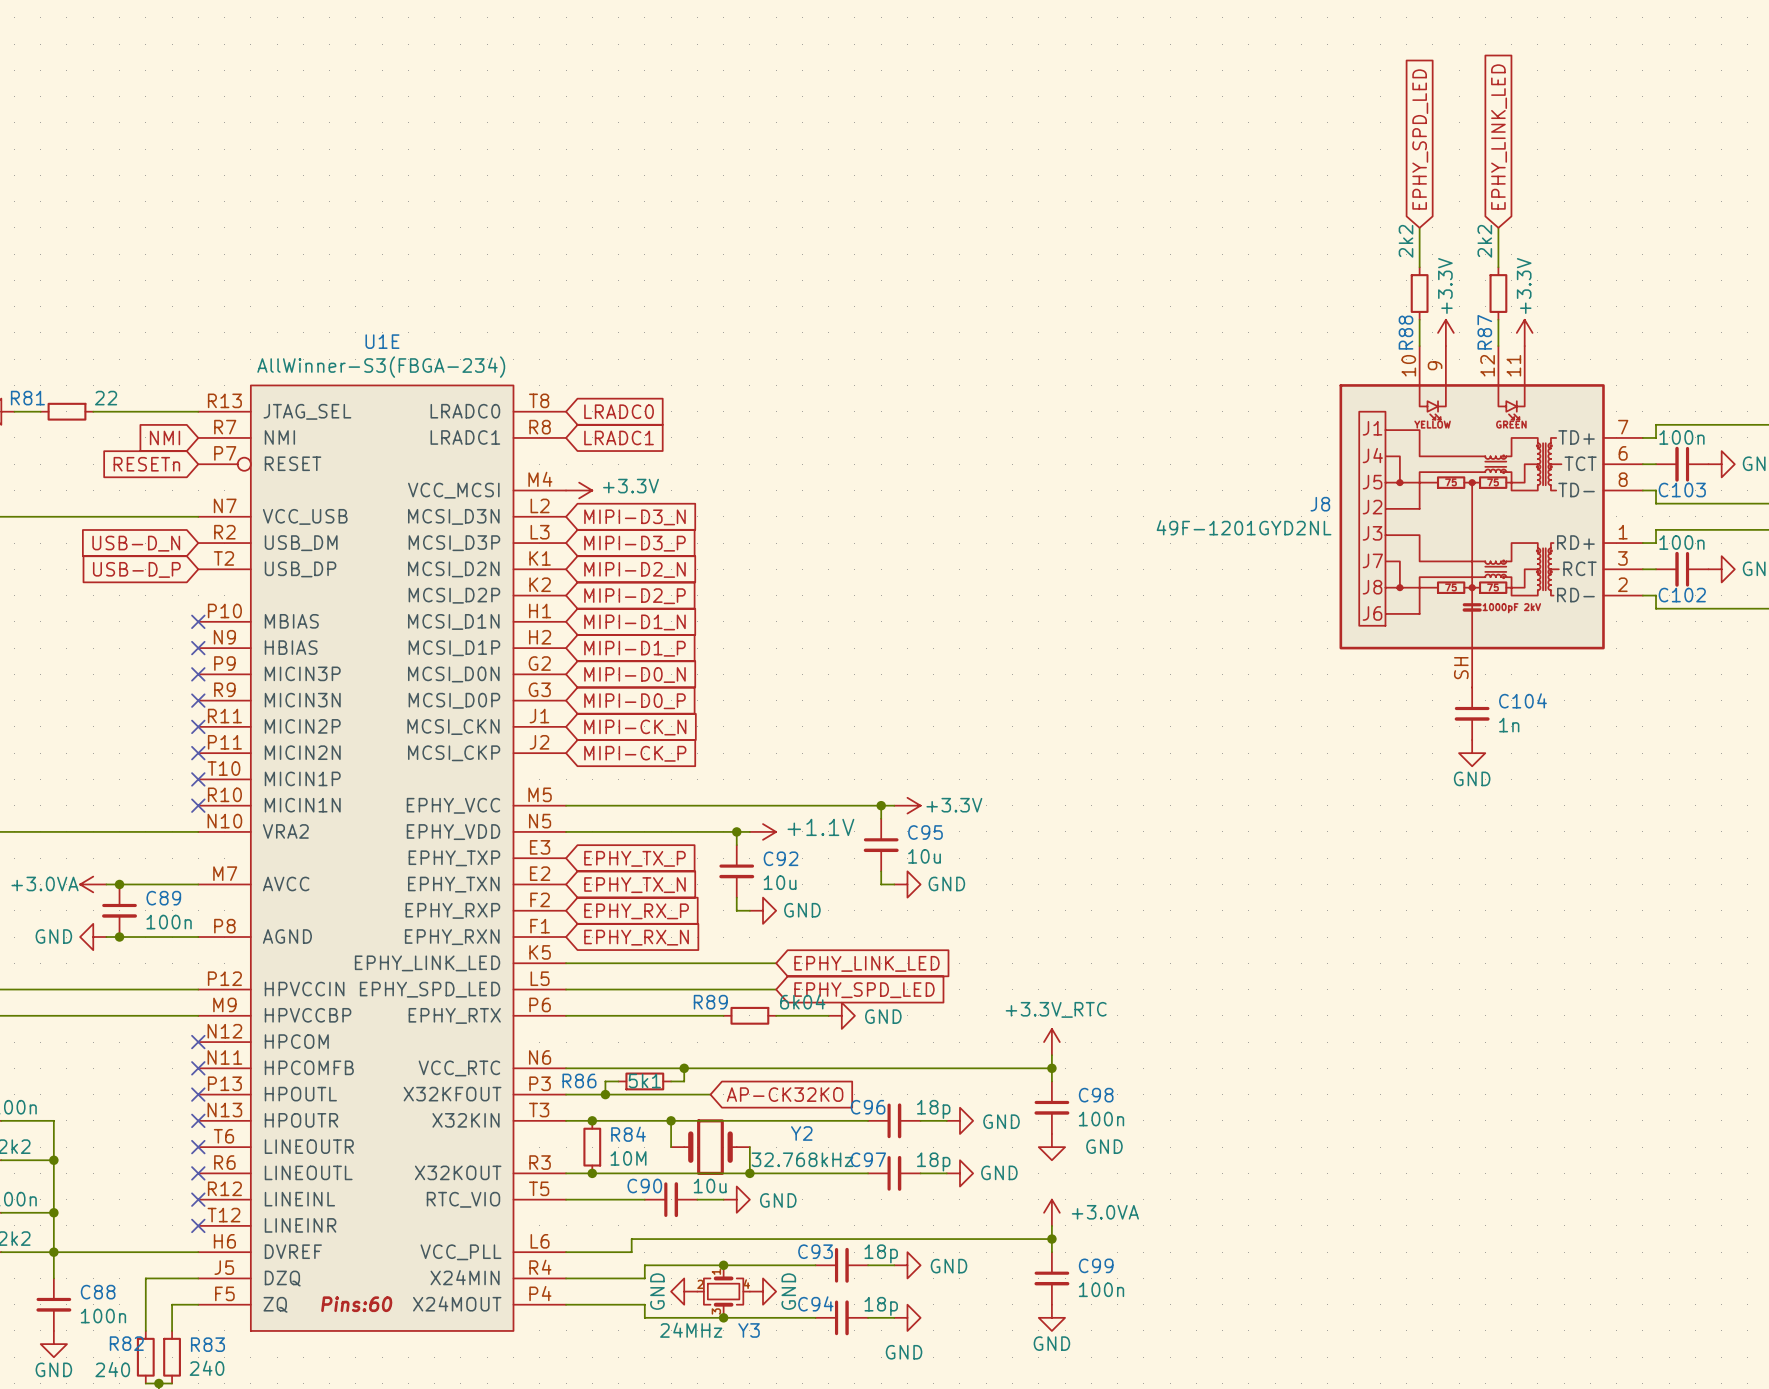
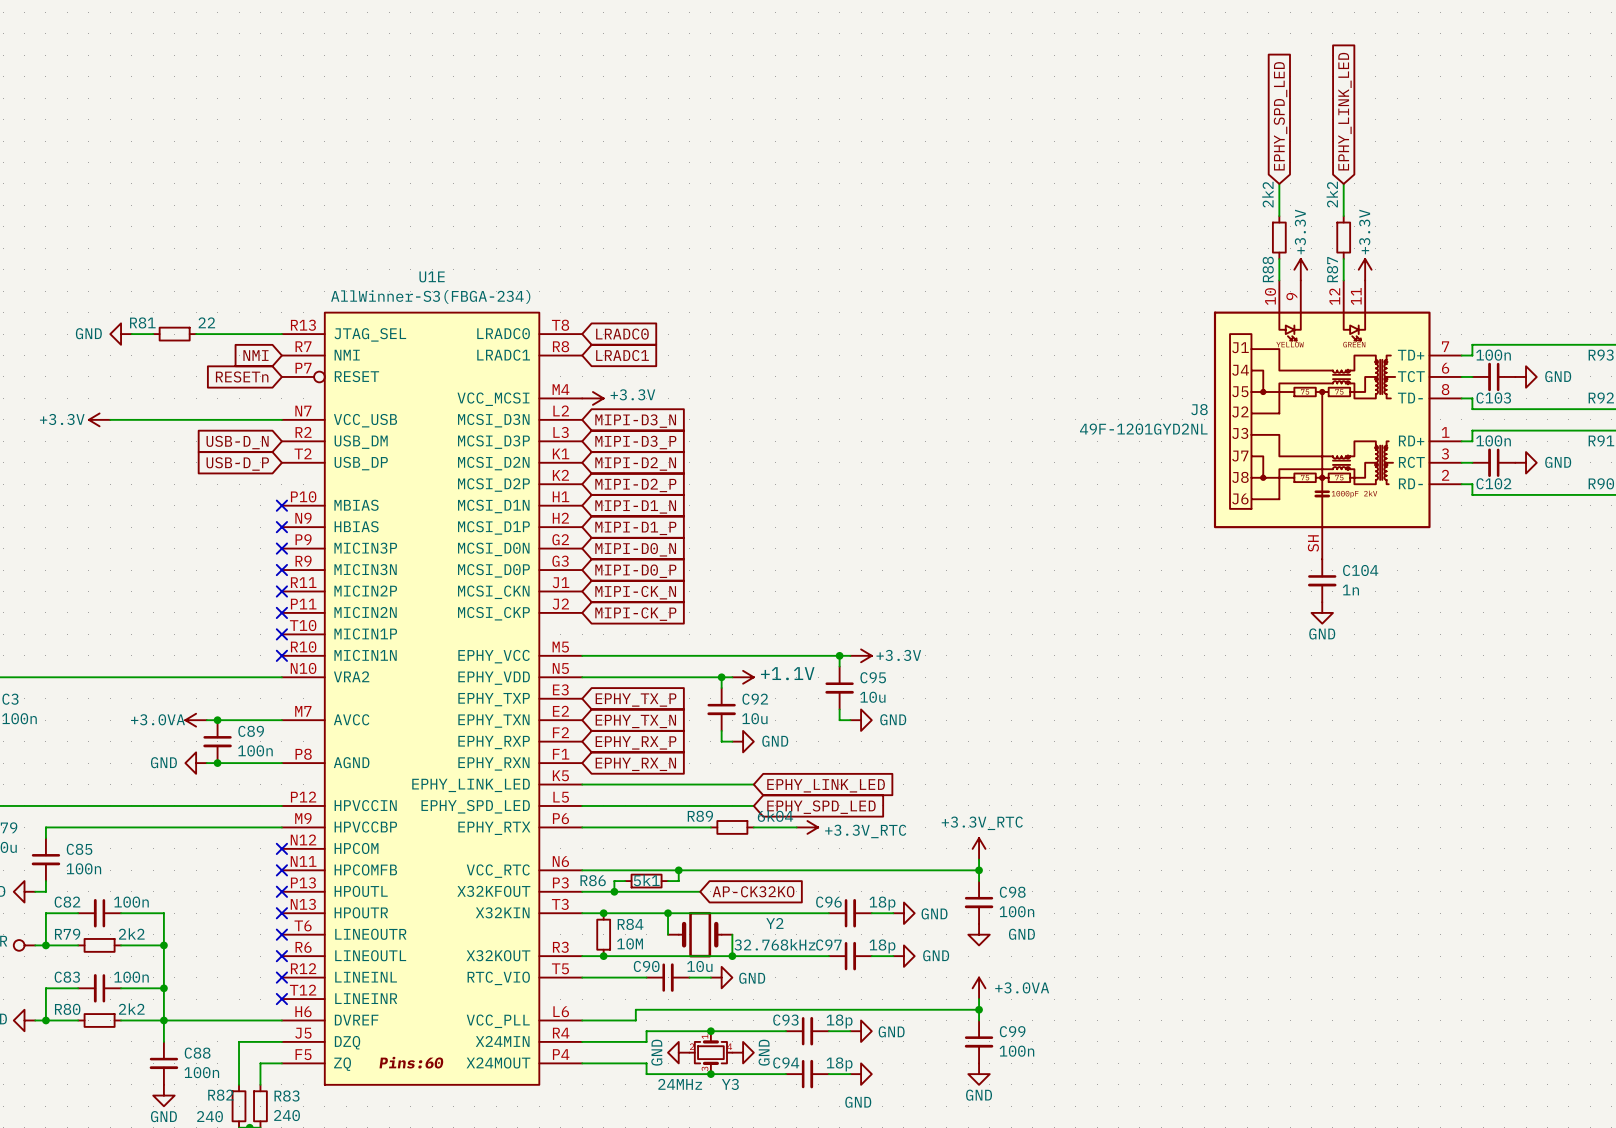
power symbol: GND (841, 1015) -> +3.3V_RTC (807, 827)

